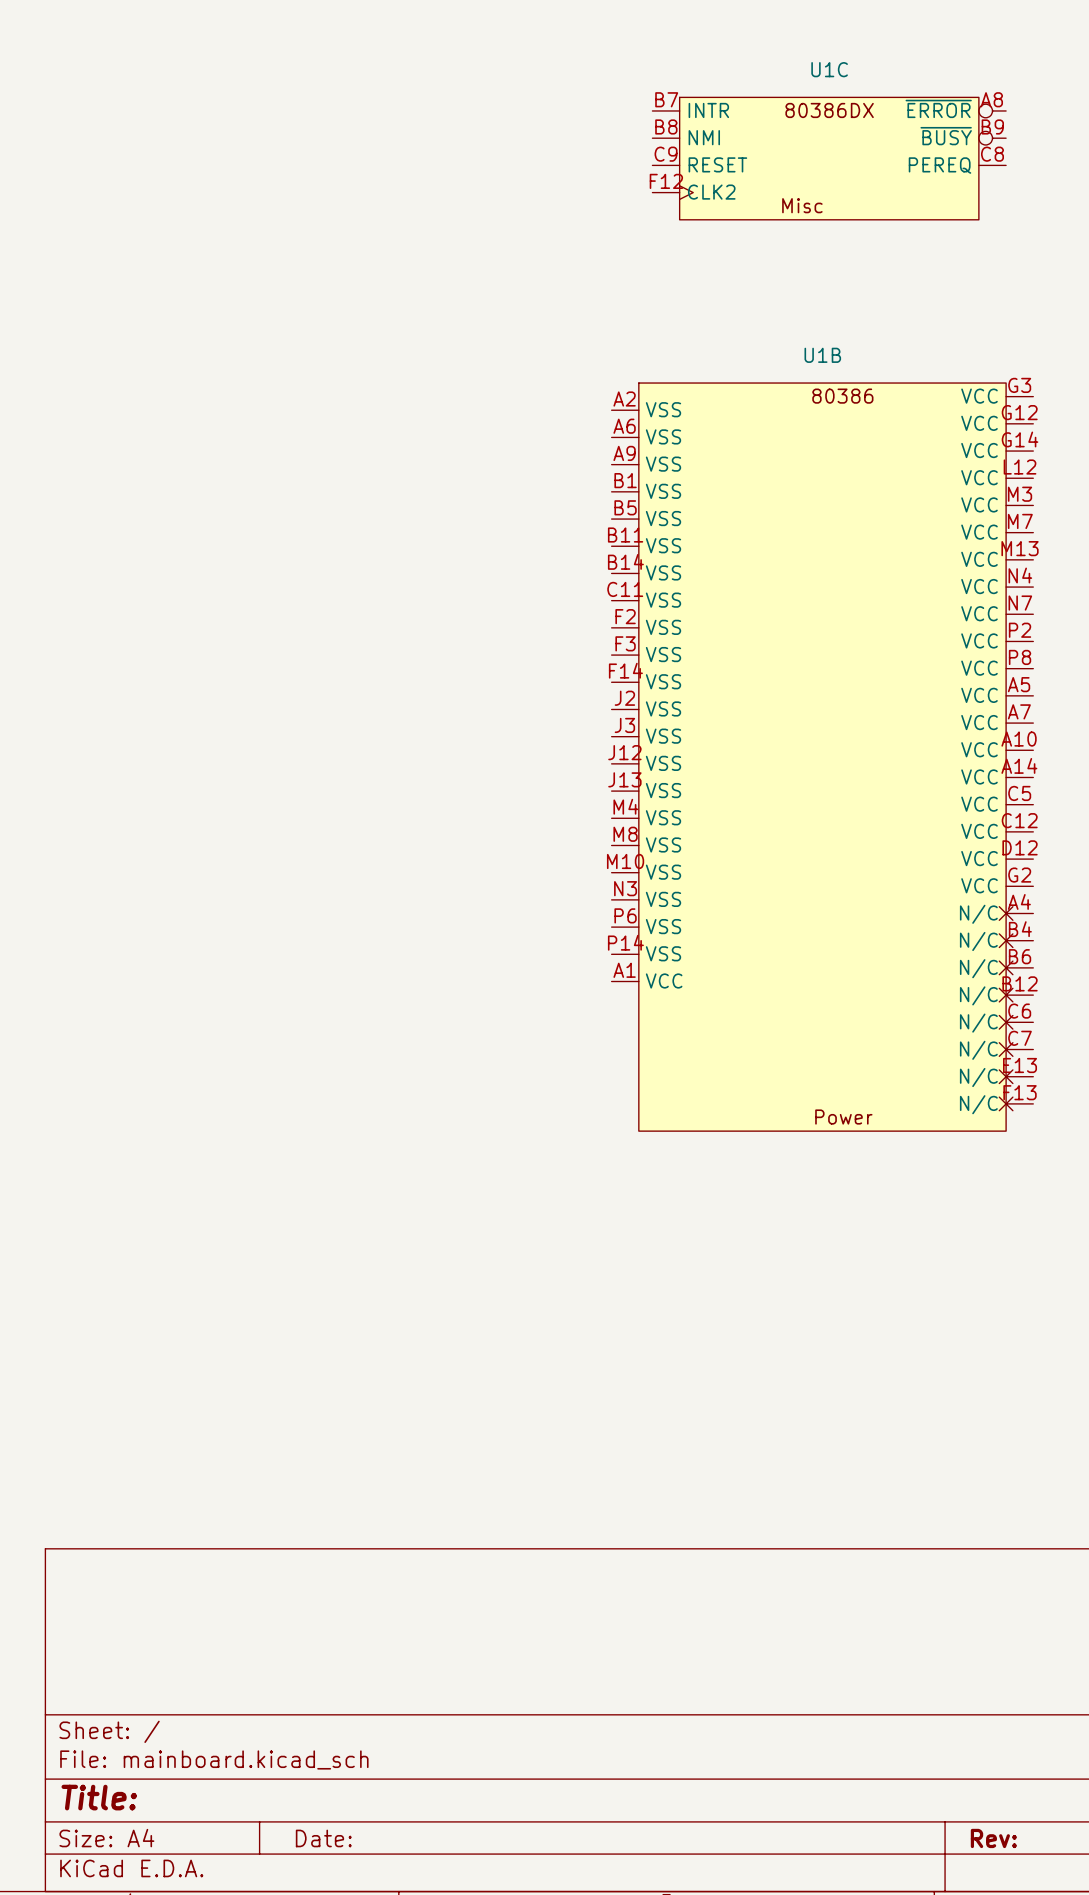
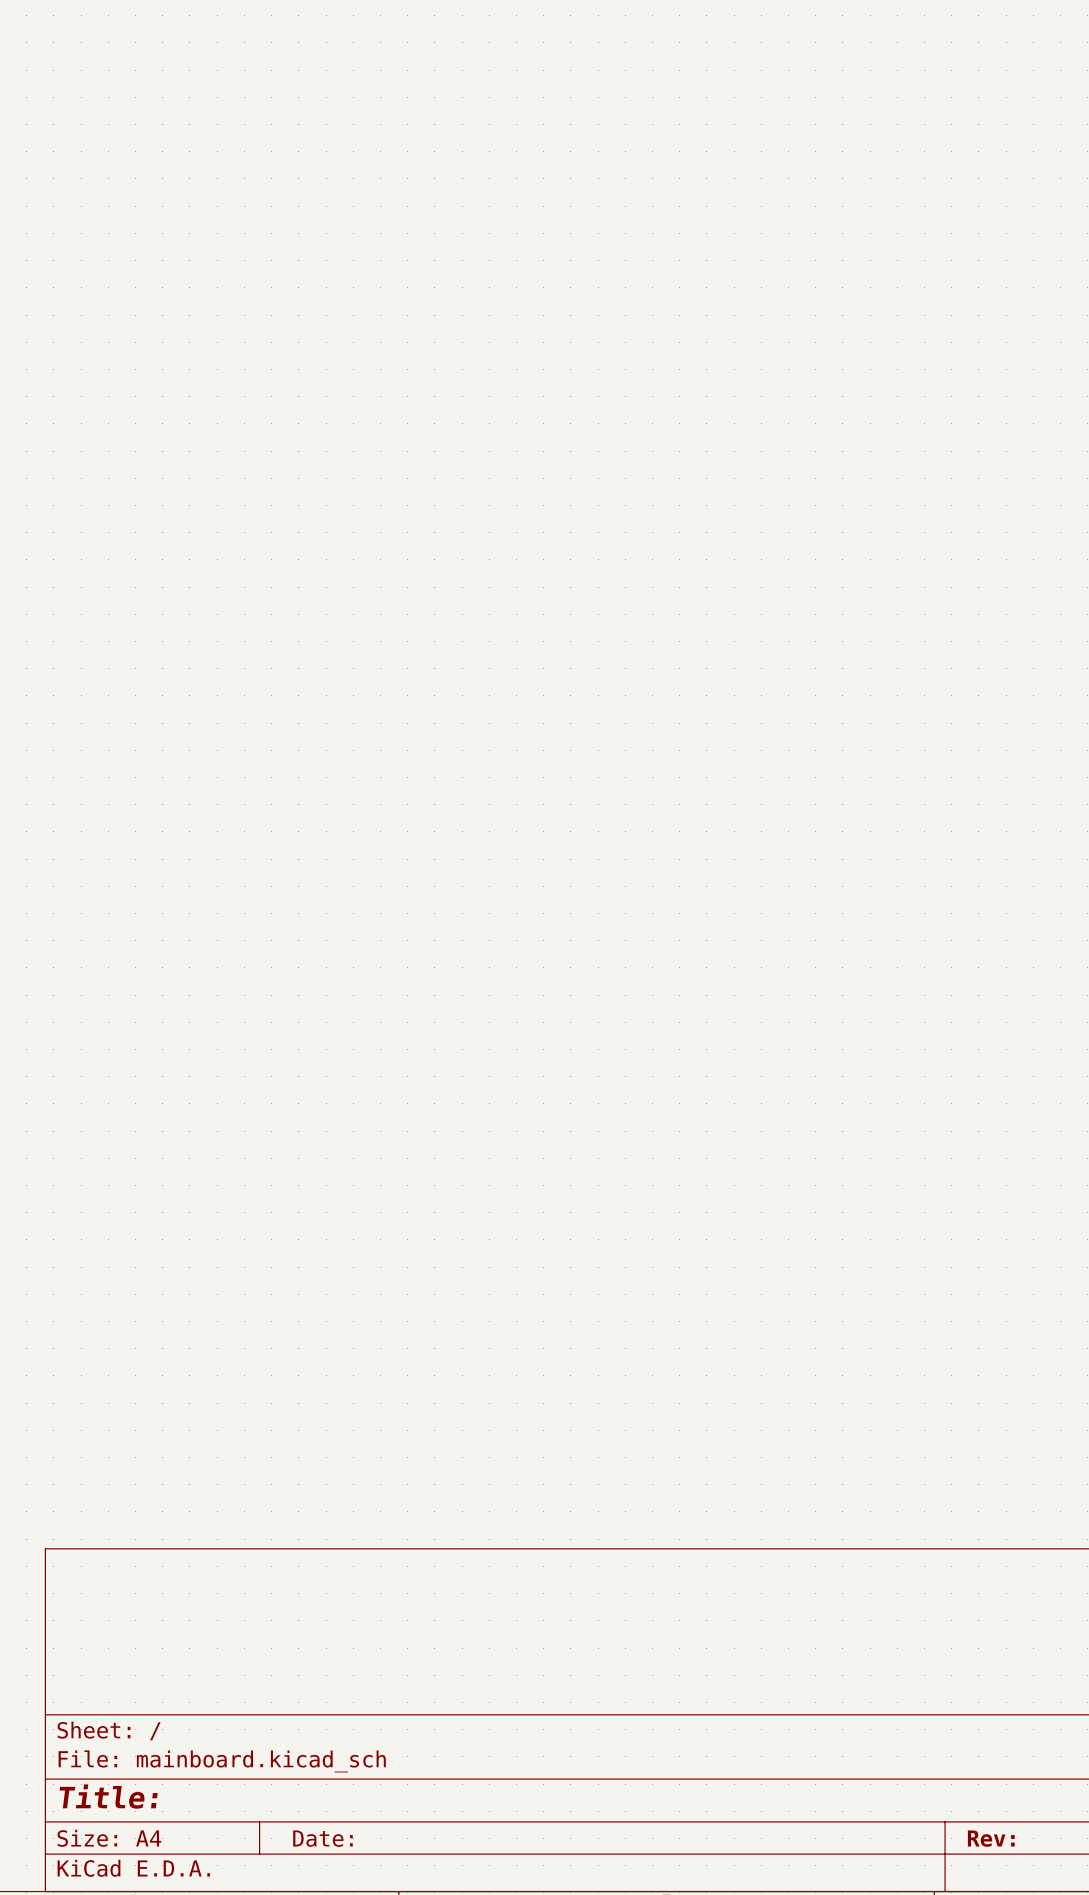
U1C: (829, 158) -> none
U1B: (822, 757) -> none

